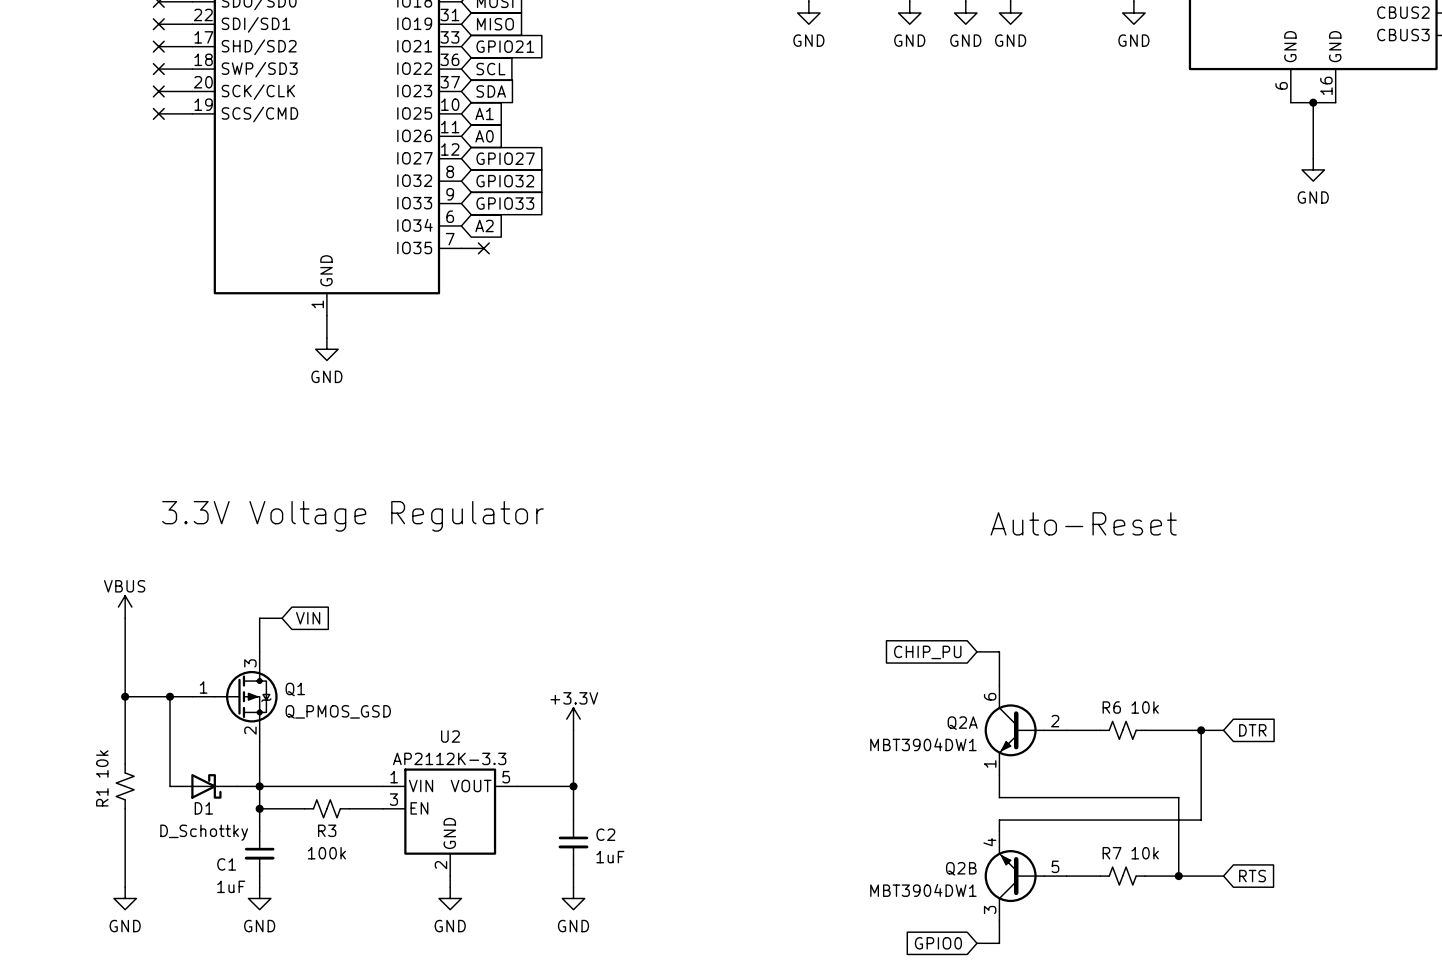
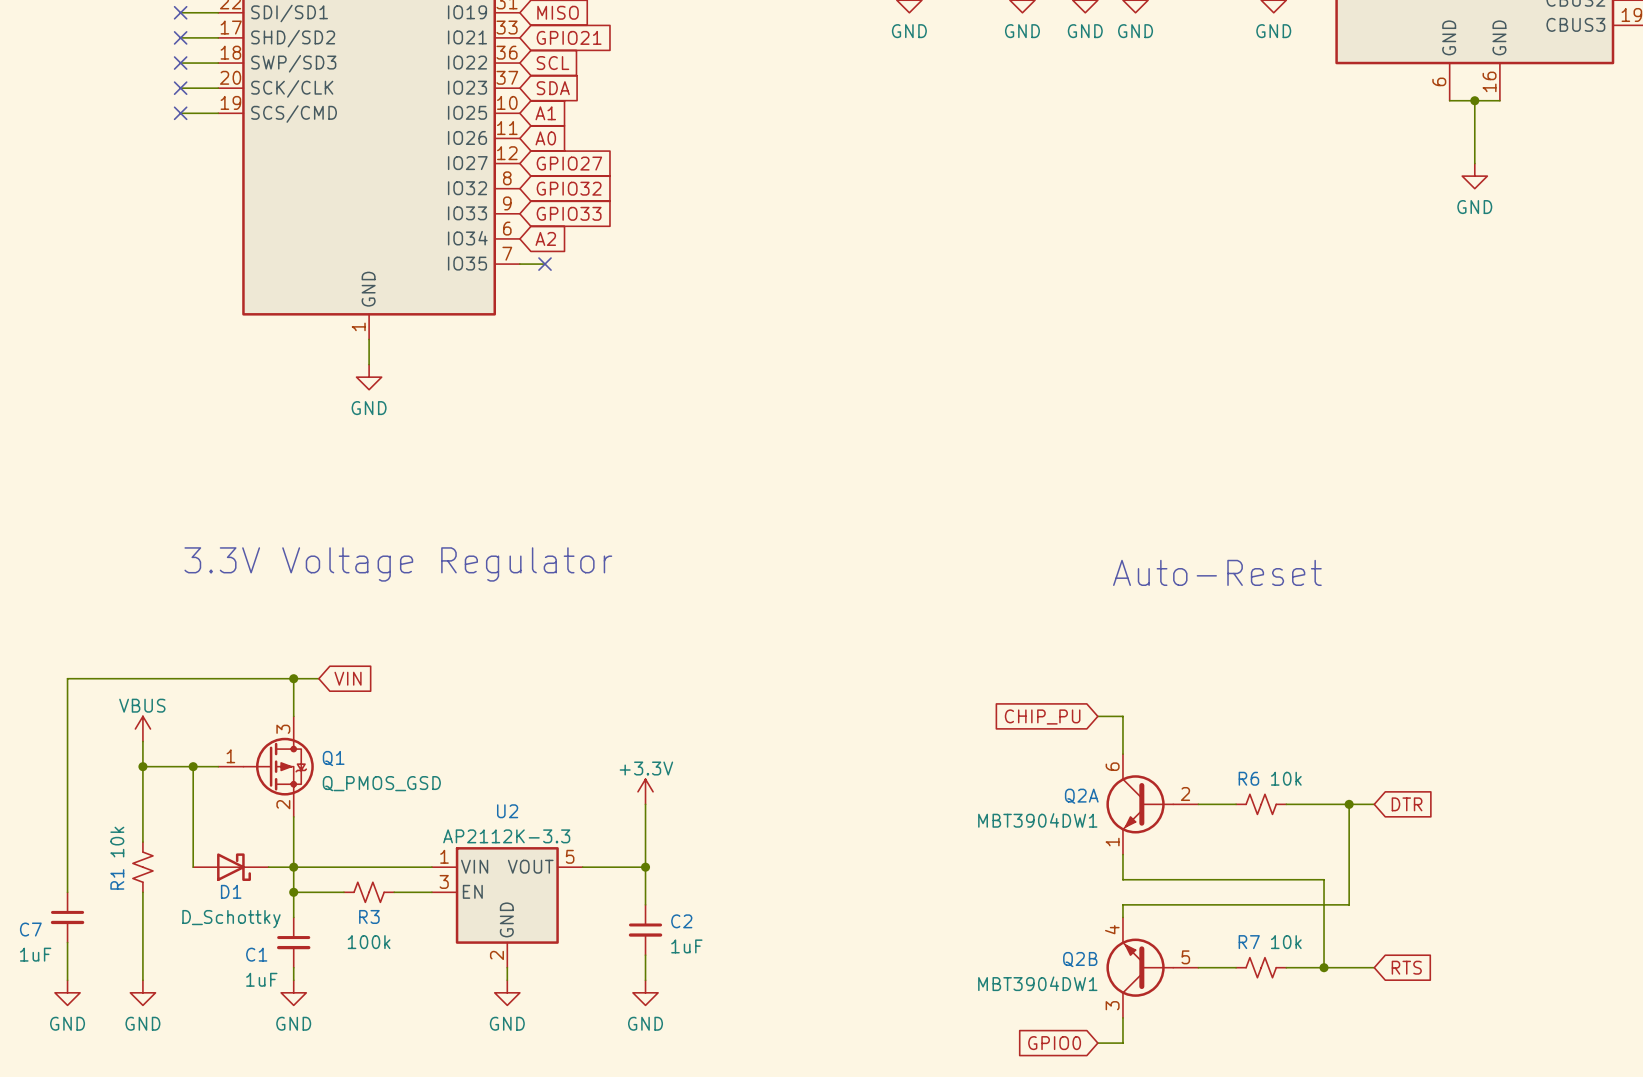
power symbol position: VBUS (125, 607) -> VBUS (142, 728)
wire: (125, 618) (125, 674) -> none
wire: none -> (293, 678) (67, 678) (67, 892)
junction: none -> (293, 678)
C7: none -> 1uF (67, 917)
wire: none -> (67, 942) (67, 980)
power symbol: none -> GND (67, 992)

